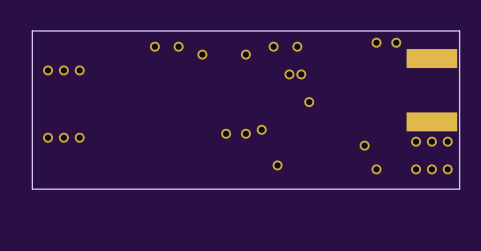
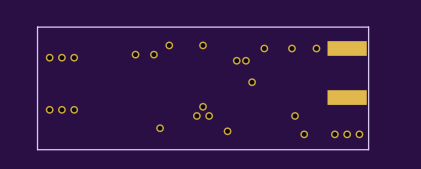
via: (376, 42) -> none
via: (396, 42) -> none
via: (154, 46) -> none
via: (178, 46) -> none
via: (273, 46) -> none
via: (297, 46) -> none
via: none -> (264, 48)
via: none -> (291, 48)
via: none -> (316, 48)
via: none -> (135, 54)
via: none -> (153, 54)
via: (261, 129) -> none
via: (226, 133) -> none
via: (416, 141) -> none
via: (431, 141) -> none
via: (447, 141) -> none
via: none -> (196, 115)
via: none -> (209, 115)
via: none -> (160, 128)

